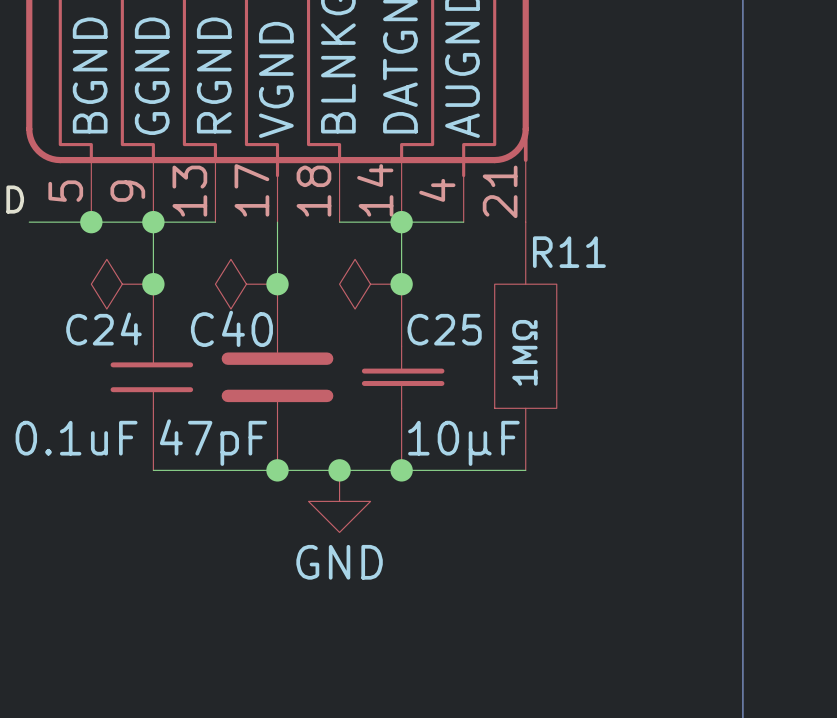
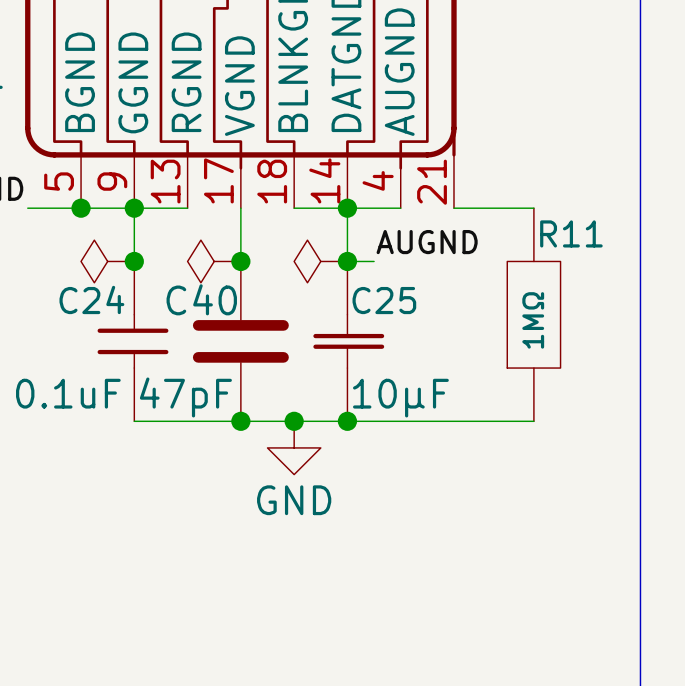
wire: none -> (453, 208) (533, 208)
label: none -> AUGND (427, 242)
wire: none -> (347, 261) (374, 261)
R11 position: (525, 346) -> (533, 314)
wire: none -> (453, 421) (533, 421)

